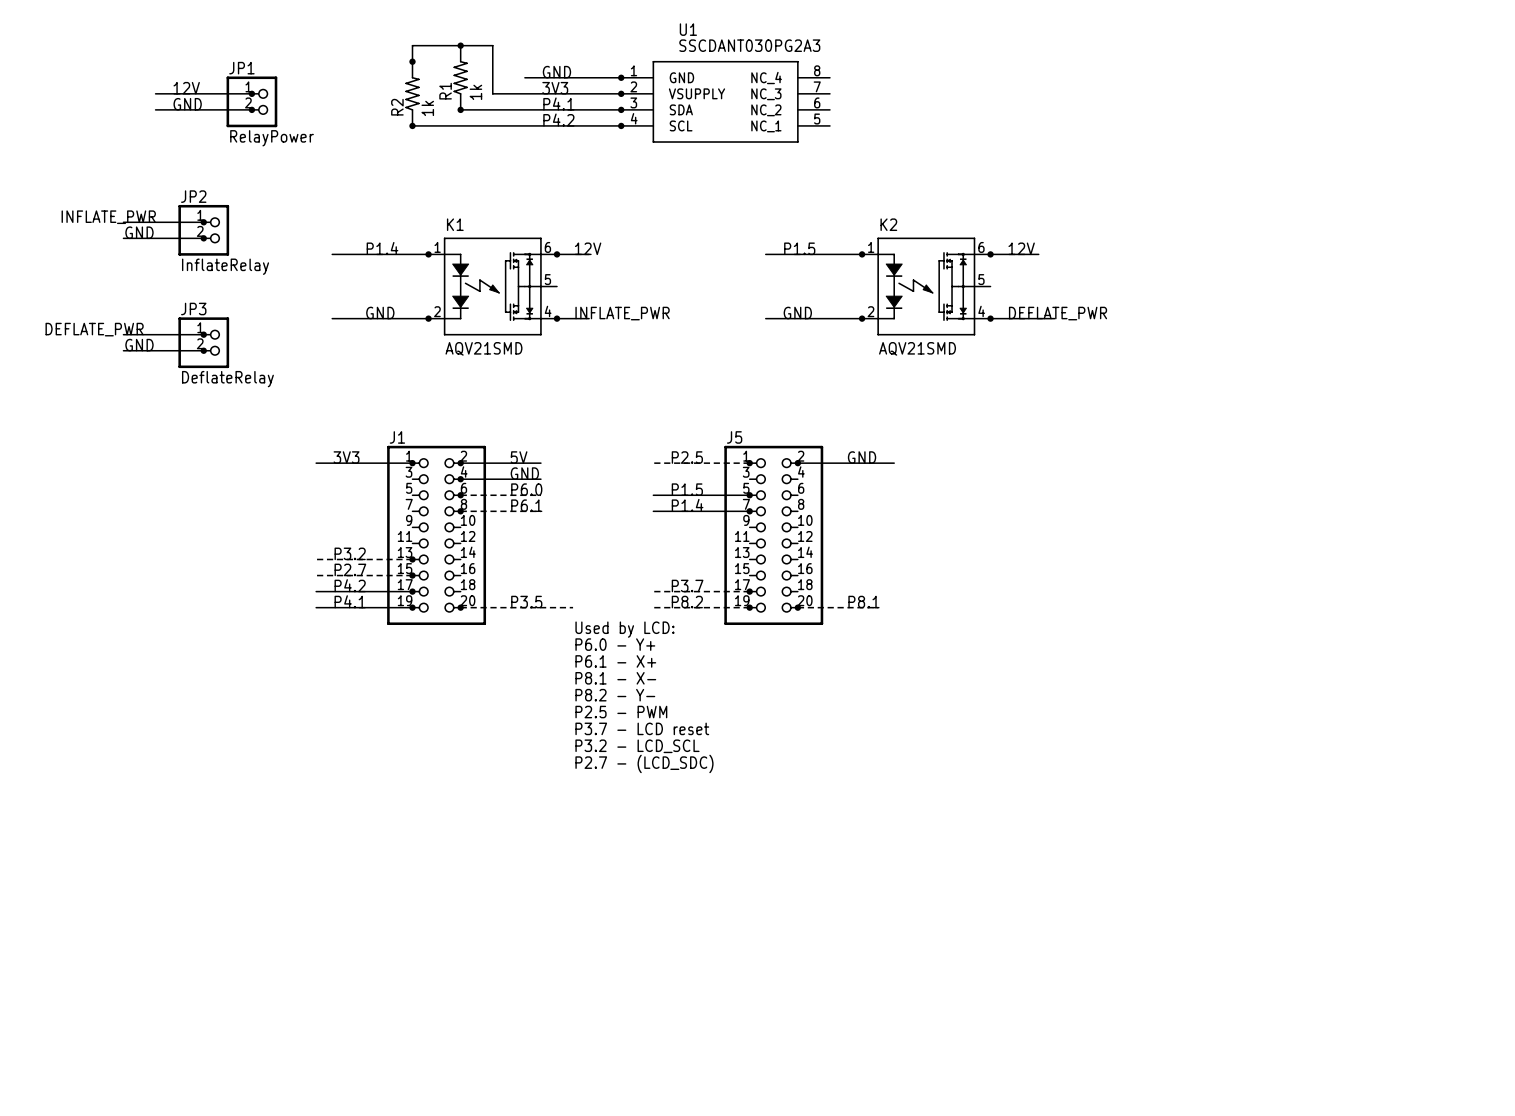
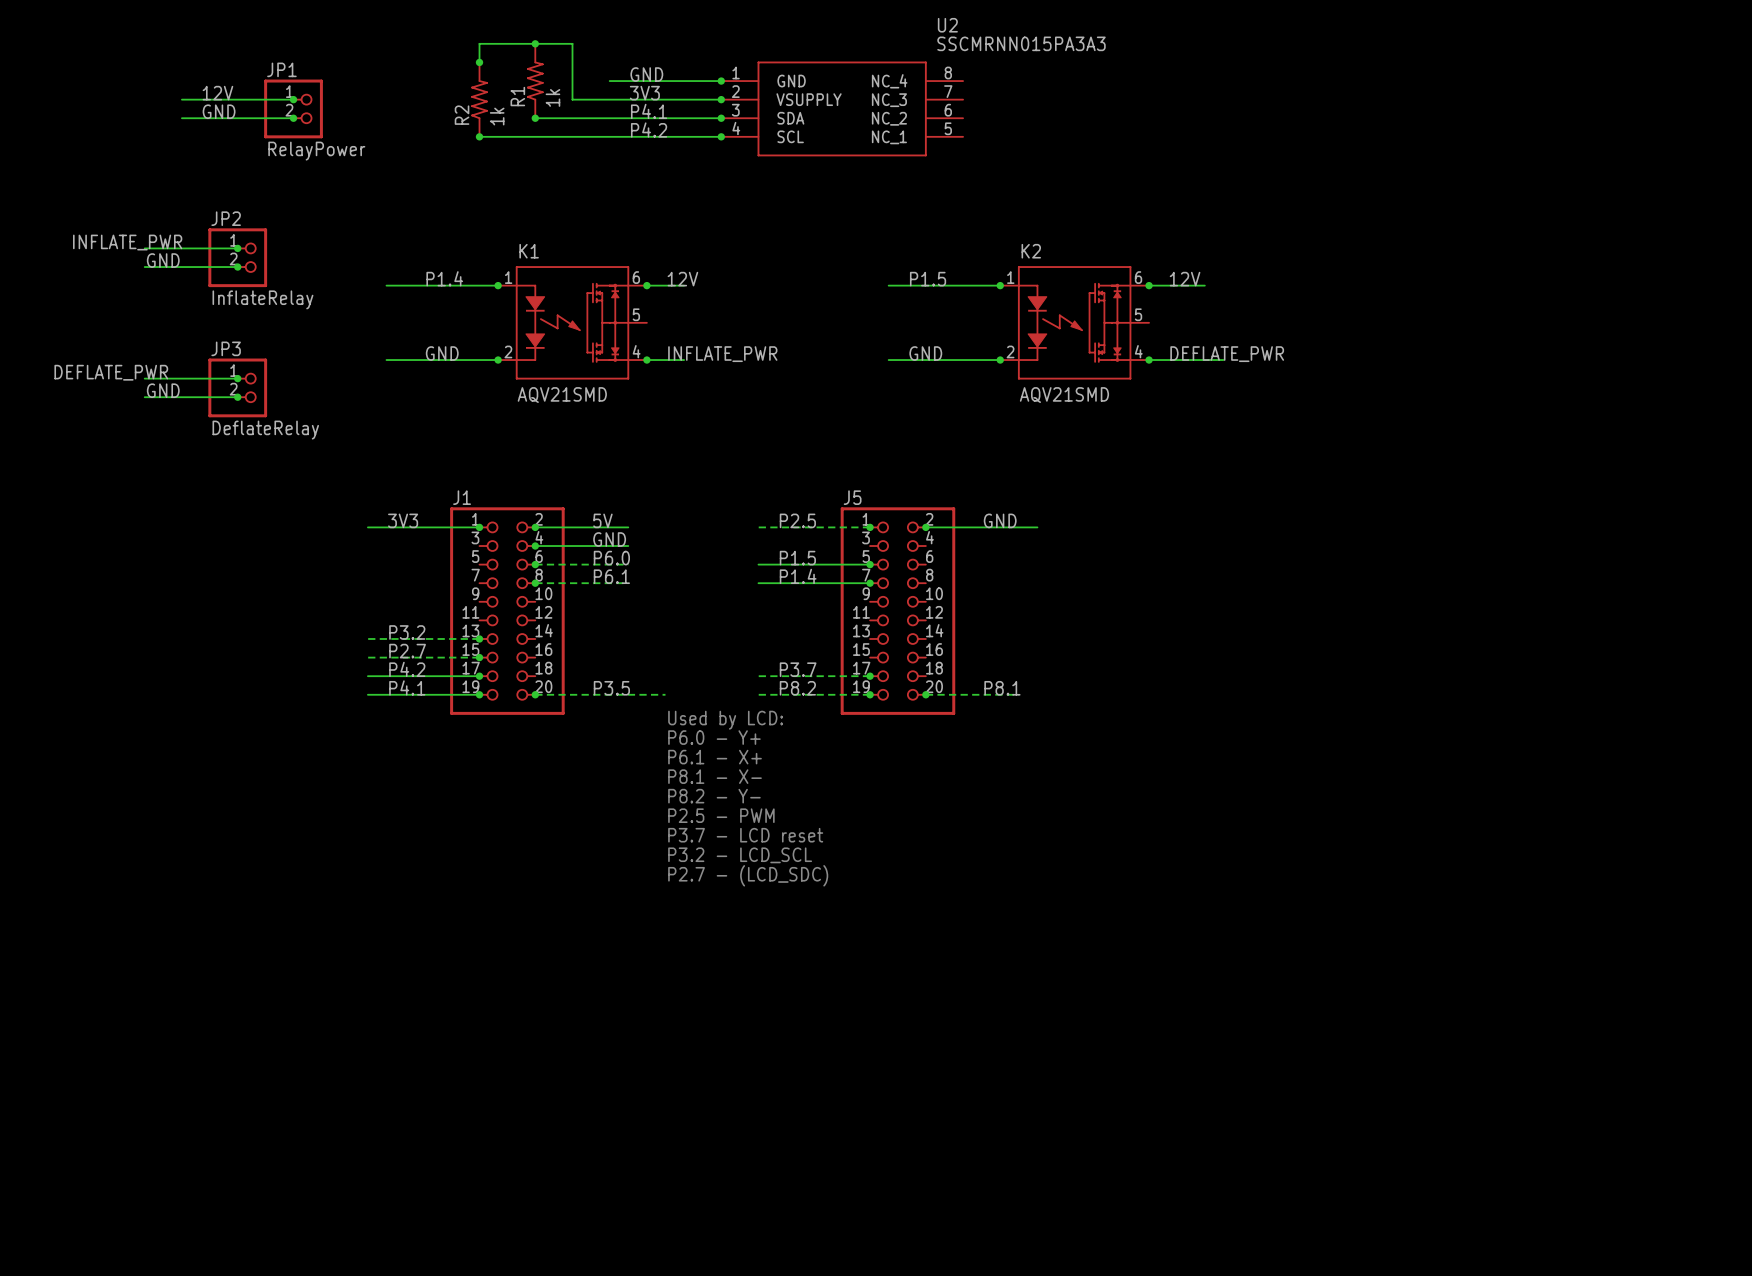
U1 name: U1 (688, 29) -> U2 (947, 25)
U1 value: SSCDANT030PG2A3 (749, 45) -> SSCMRNN015PA3A3 (1021, 43)

